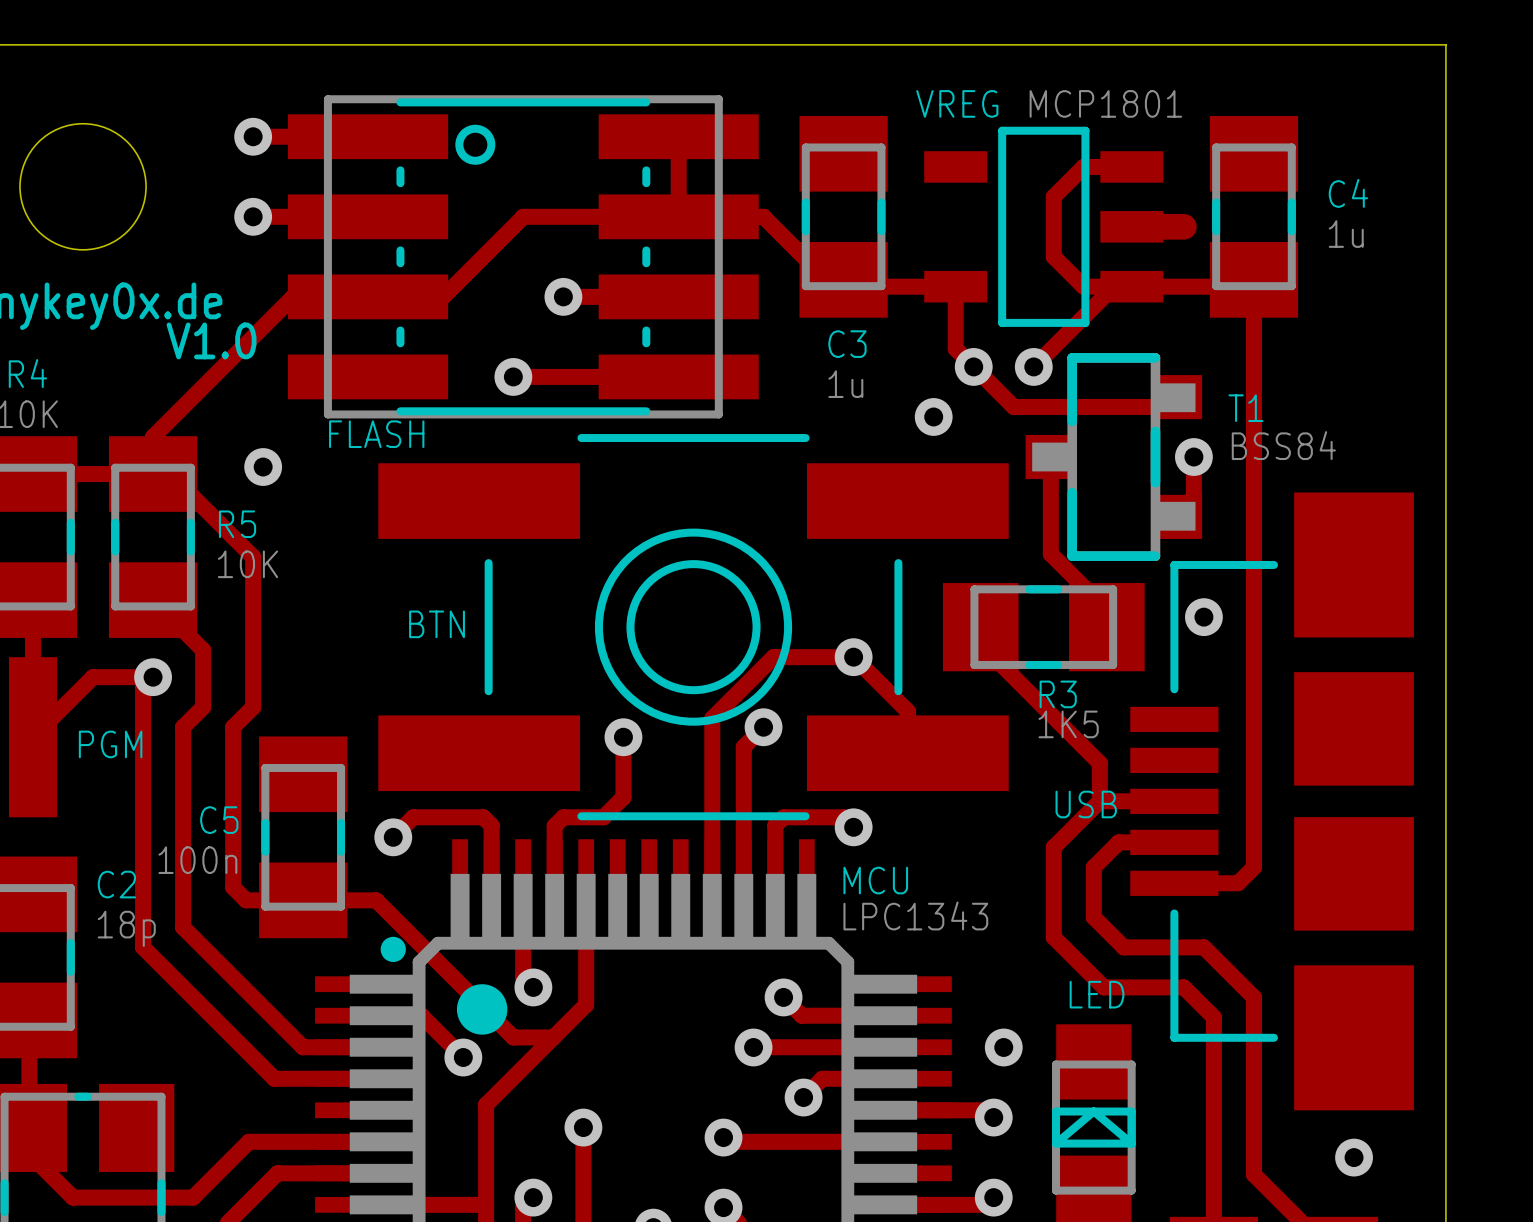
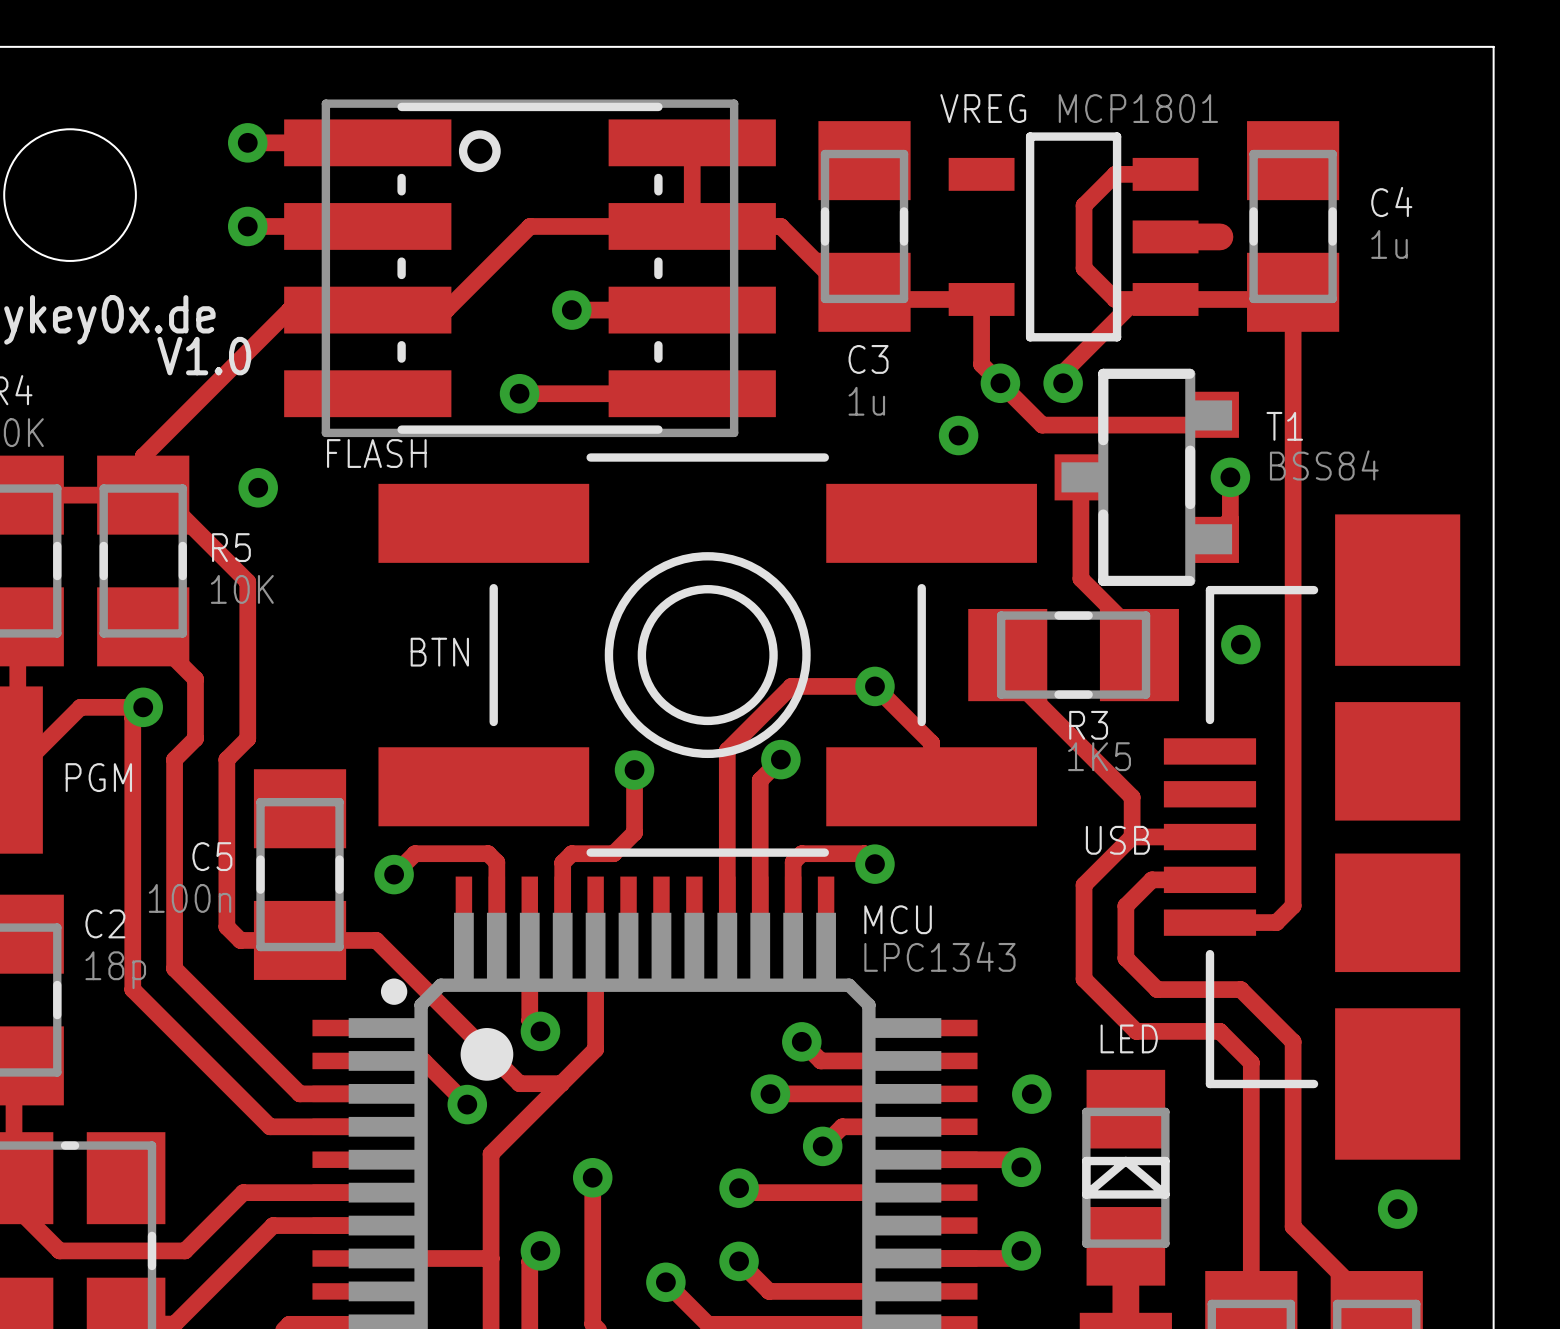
track: none -> (1136, 299) (1063, 372)
track: (1114, 286) (1033, 366) -> none

